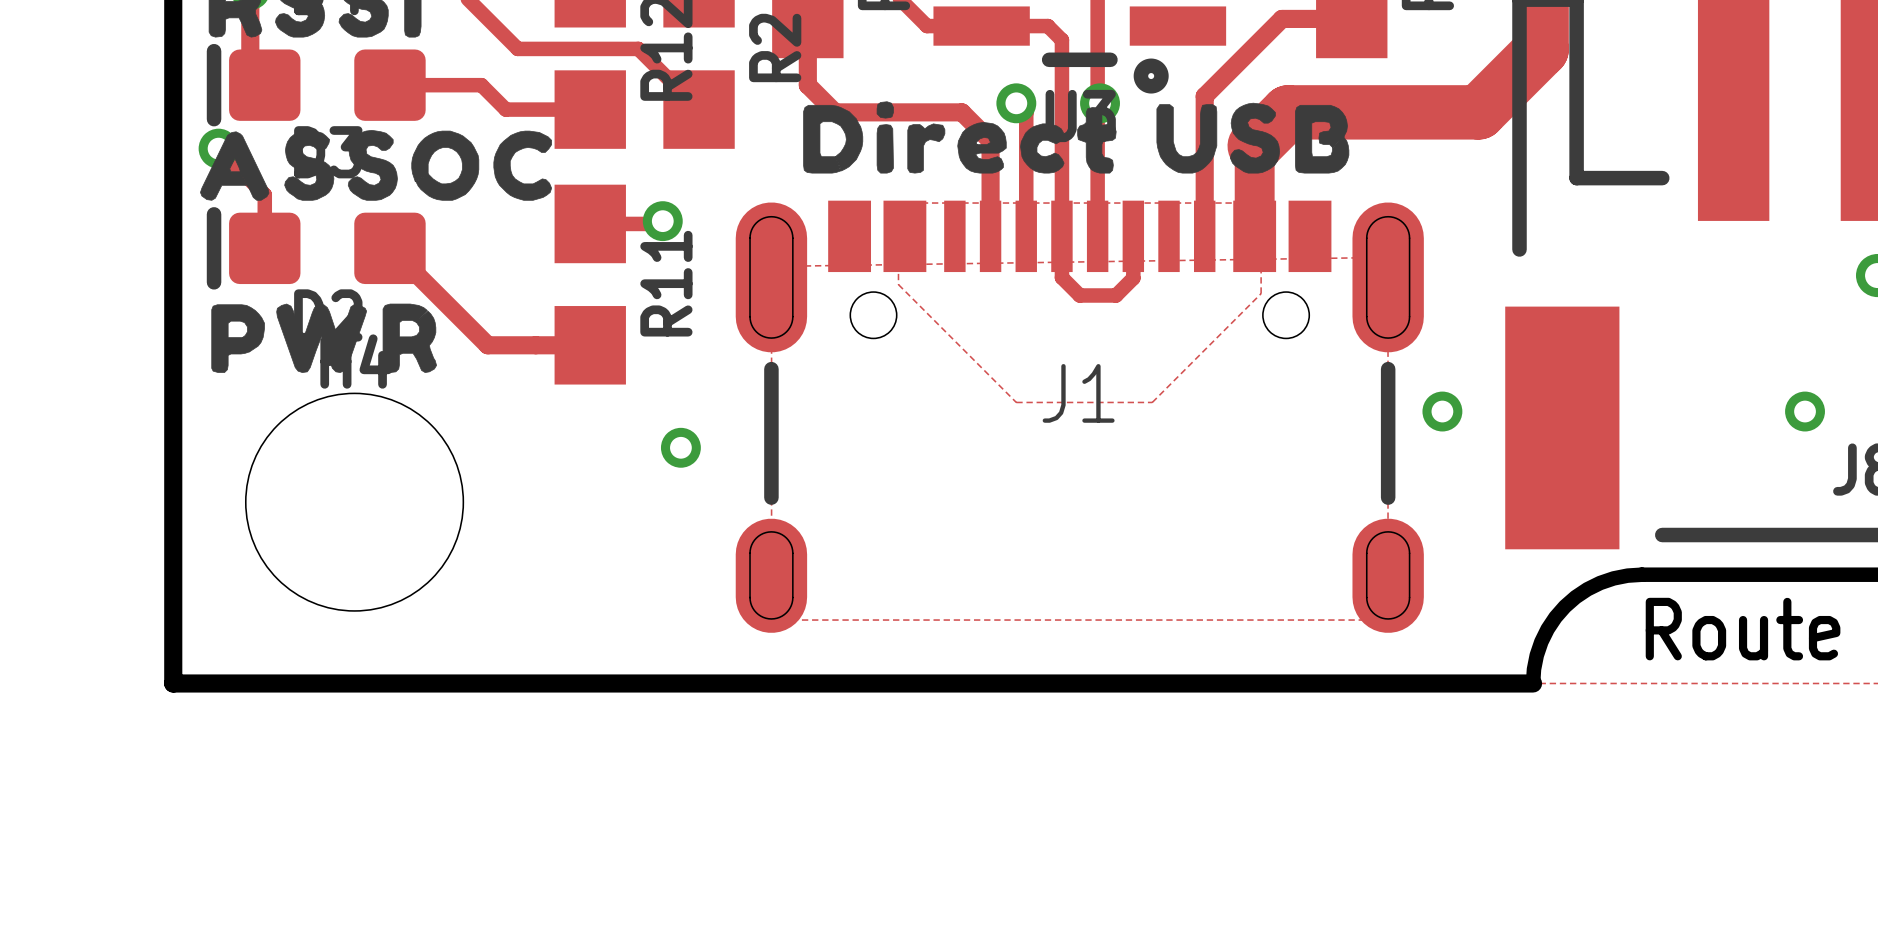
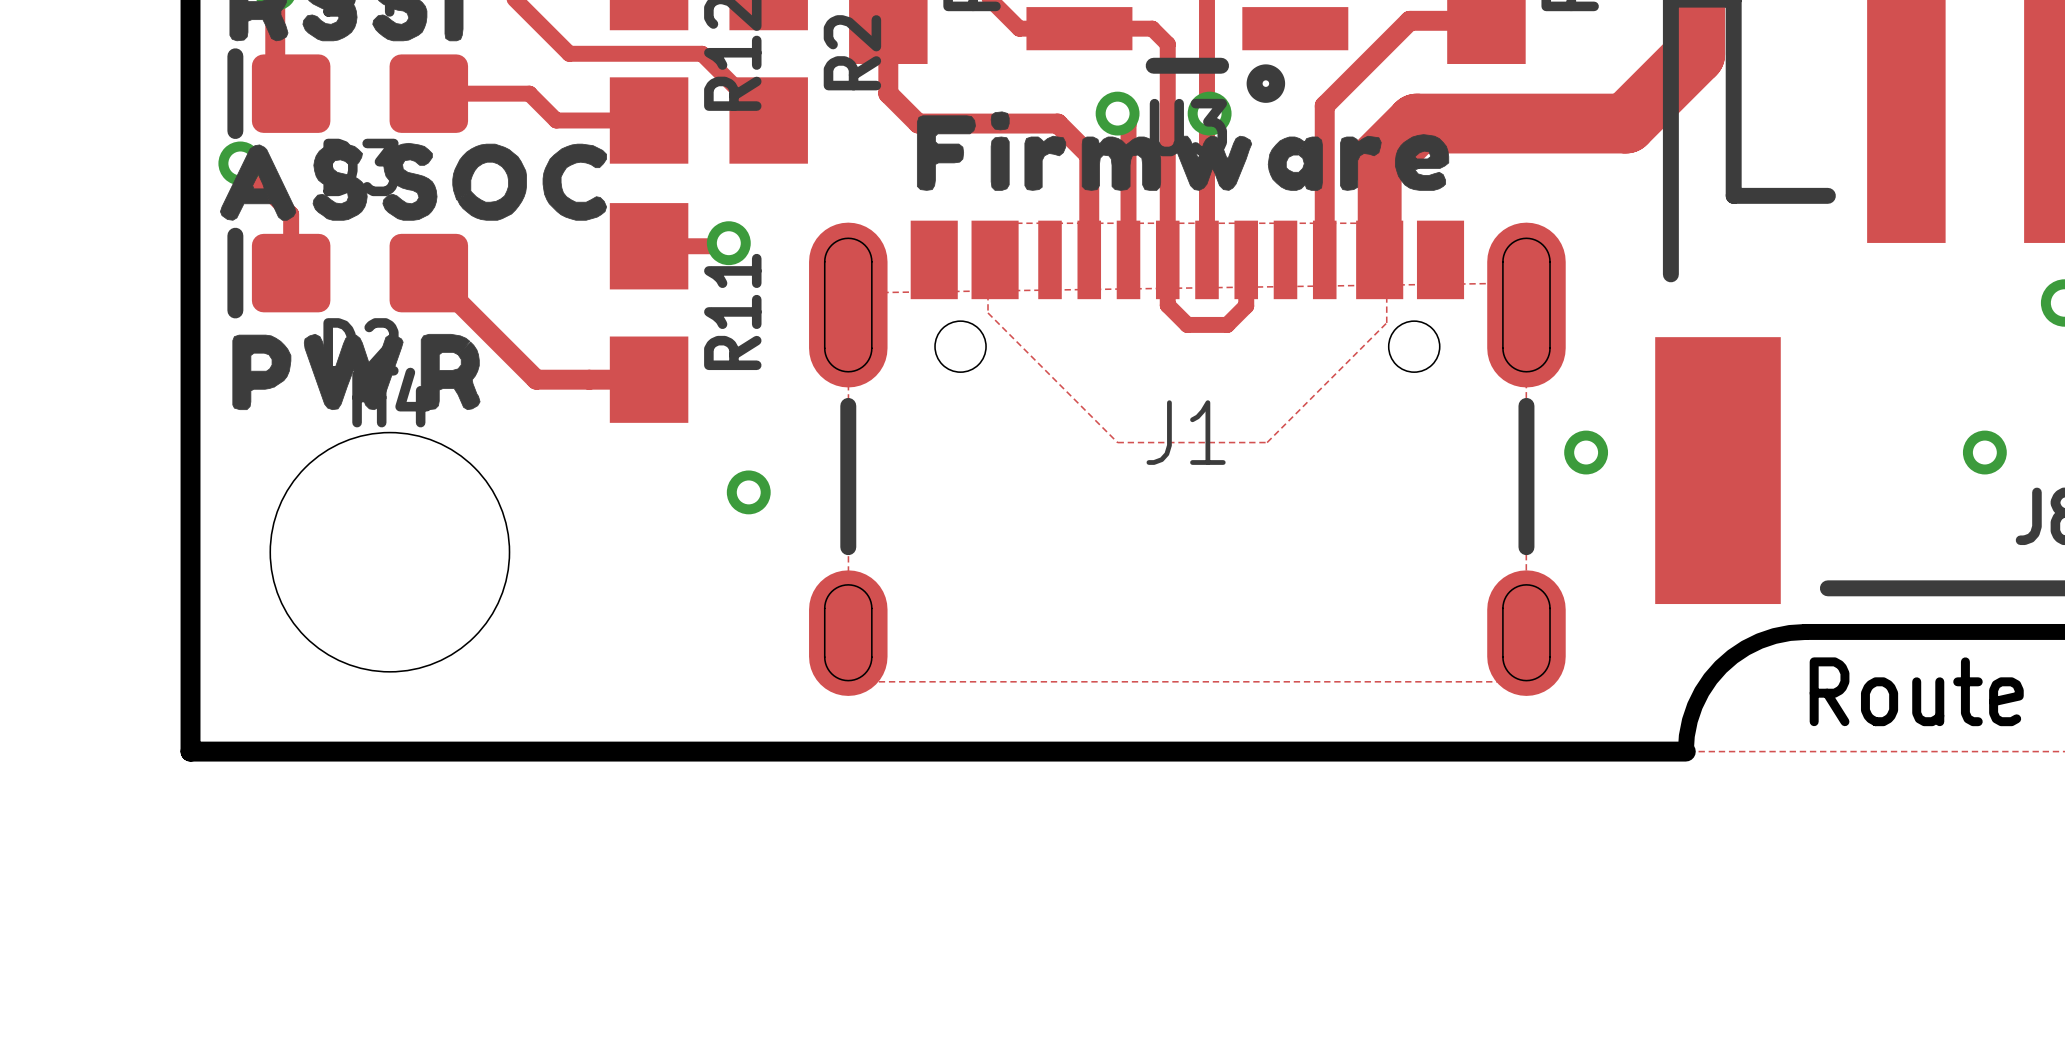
drawing shape: [803, 101, 1350, 174] -> [916, 111, 1450, 191]

